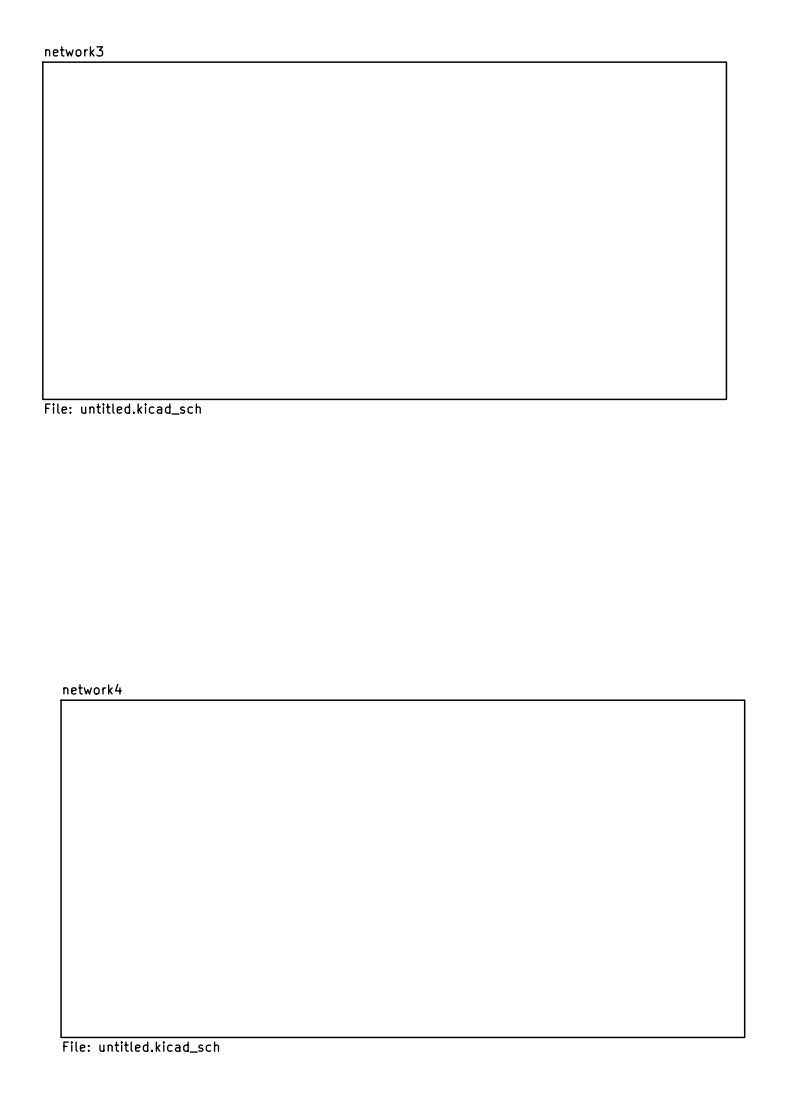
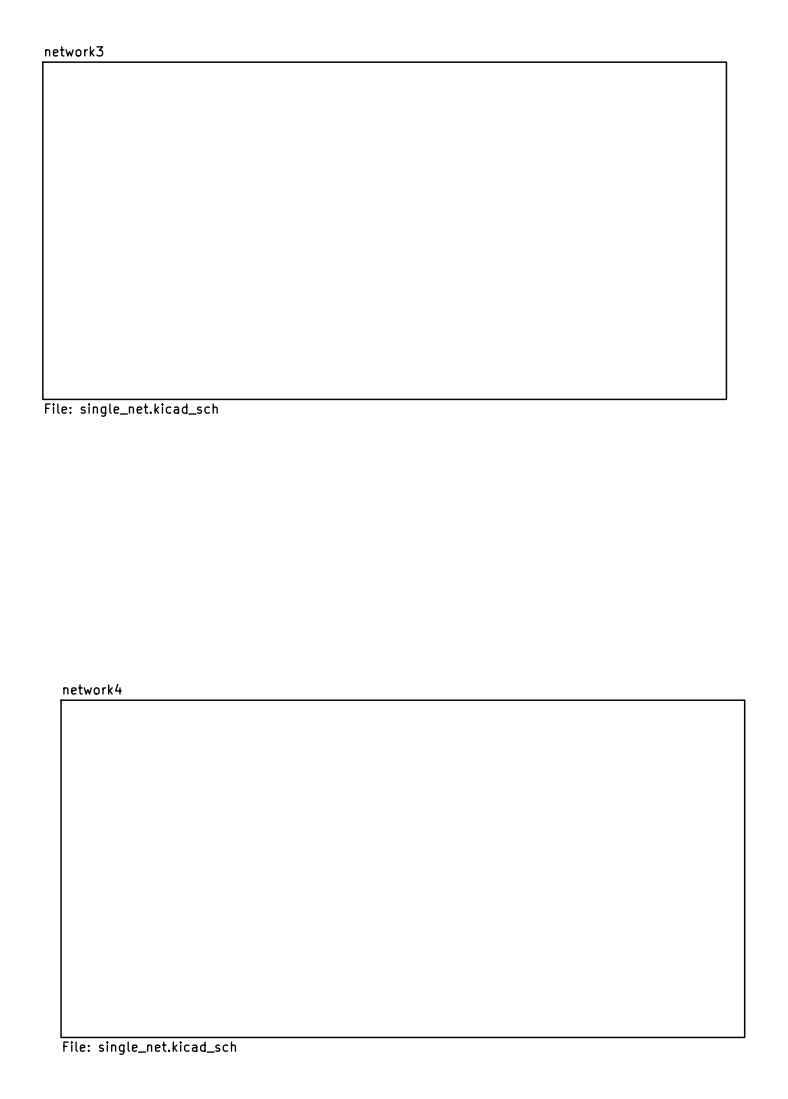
sheet network3 value: File: untitled.kicad_sch (122, 409) -> File: single_net.kicad_sch (131, 410)
sheet network4 value: File: untitled.kicad_sch (141, 1047) -> File: single_net.kicad_sch (149, 1048)

